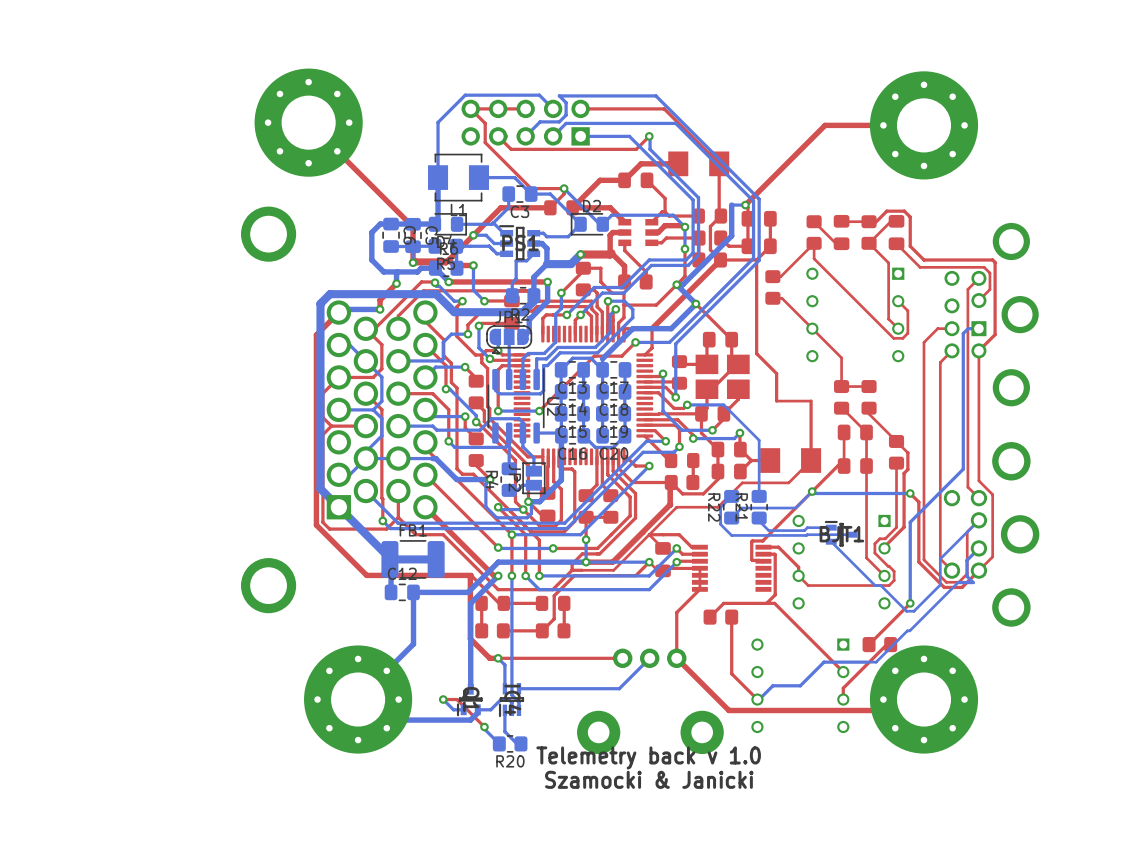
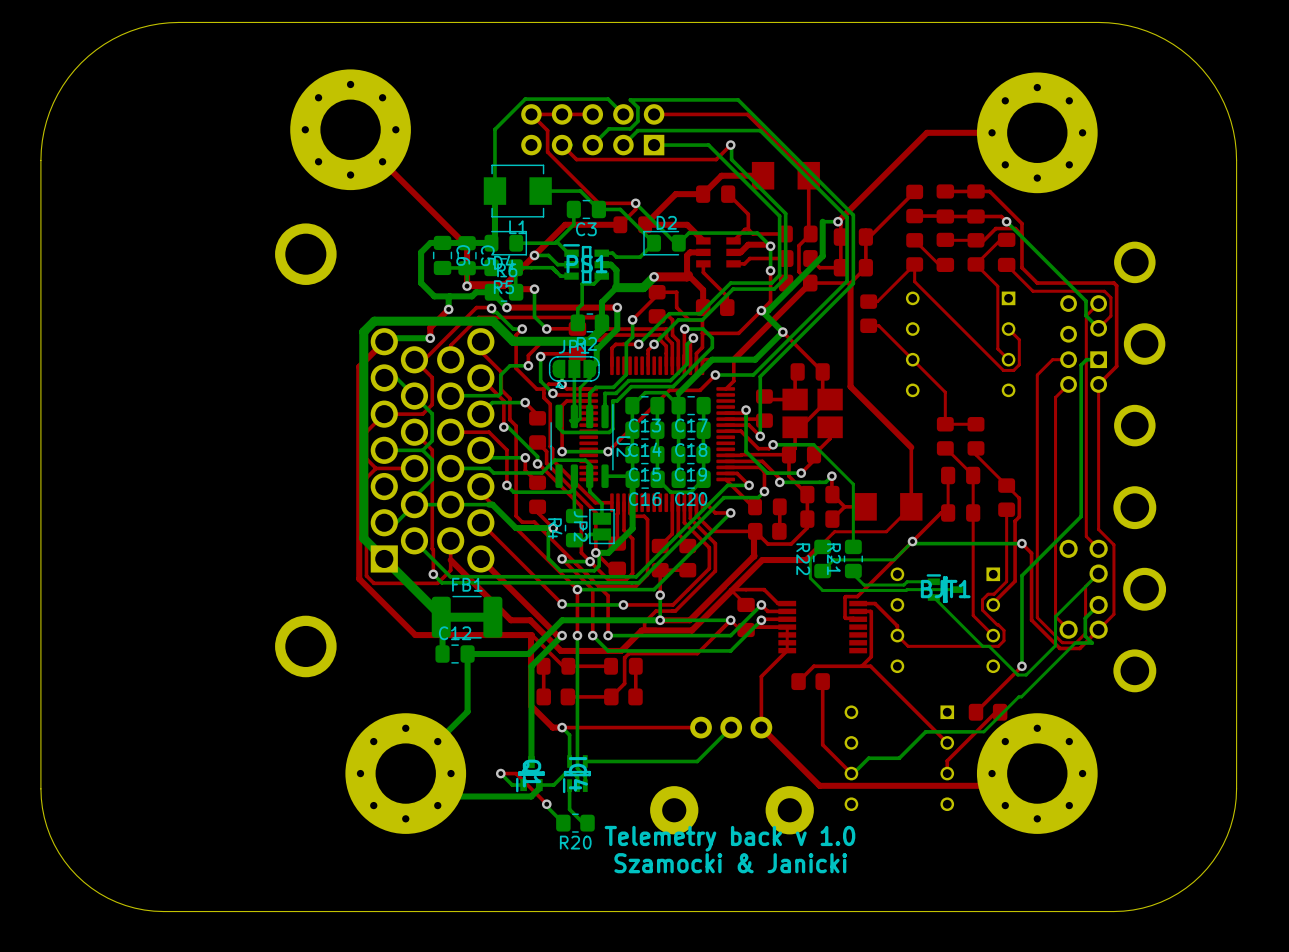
board edge: none -> (1098, 22) (178, 22) (159, 23) (130, 31) (104, 44) (88, 56) (68, 77) (53, 103) (44, 131) (40, 160) (41, 798) (44, 817) (50, 835) (58, 852) (70, 868) (83, 882) (107, 898) (134, 908) (163, 911) (1113, 911) (1133, 910) (1151, 905) (1178, 893) (1193, 882) (1213, 860) (1223, 844) (1230, 826) (1236, 798) (1235, 140) (1227, 112) (1219, 94) (1209, 77) (1188, 56) (1173, 44) (1146, 31) (1118, 23) (1098, 22)
top track: none -> (945, 191) (989, 191) (1021, 223) (1021, 235)
top track: none -> (914, 191) (869, 237) (865, 237) (865, 229)
part: none -> (914, 203)
part: none -> (945, 203)
part: none -> (975, 203)
top track: none -> (914, 216) (1001, 216) (1006, 221)
bottom track: none -> (1006, 221) (1086, 301) (1086, 315) (1098, 328)
via: none -> (1006, 221)
bottom track: none -> (590, 368) (590, 377) (580, 387) (580, 418) (576, 422) (570, 420)
top track: (776, 373) (776, 401) (811, 401) (811, 407) -> (850, 285) (850, 386) (911, 447)
top track: none -> (822, 543) (806, 560) (762, 560) (691, 630) (641, 630) (621, 650) (560, 650) (530, 620) (510, 620) (450, 560)
top track: (398, 517) (415, 534) (443, 534) (498, 589) -> none
top track: (635, 575) (574, 575) (558, 592) -> (715, 635) (697, 653) (628, 653)

